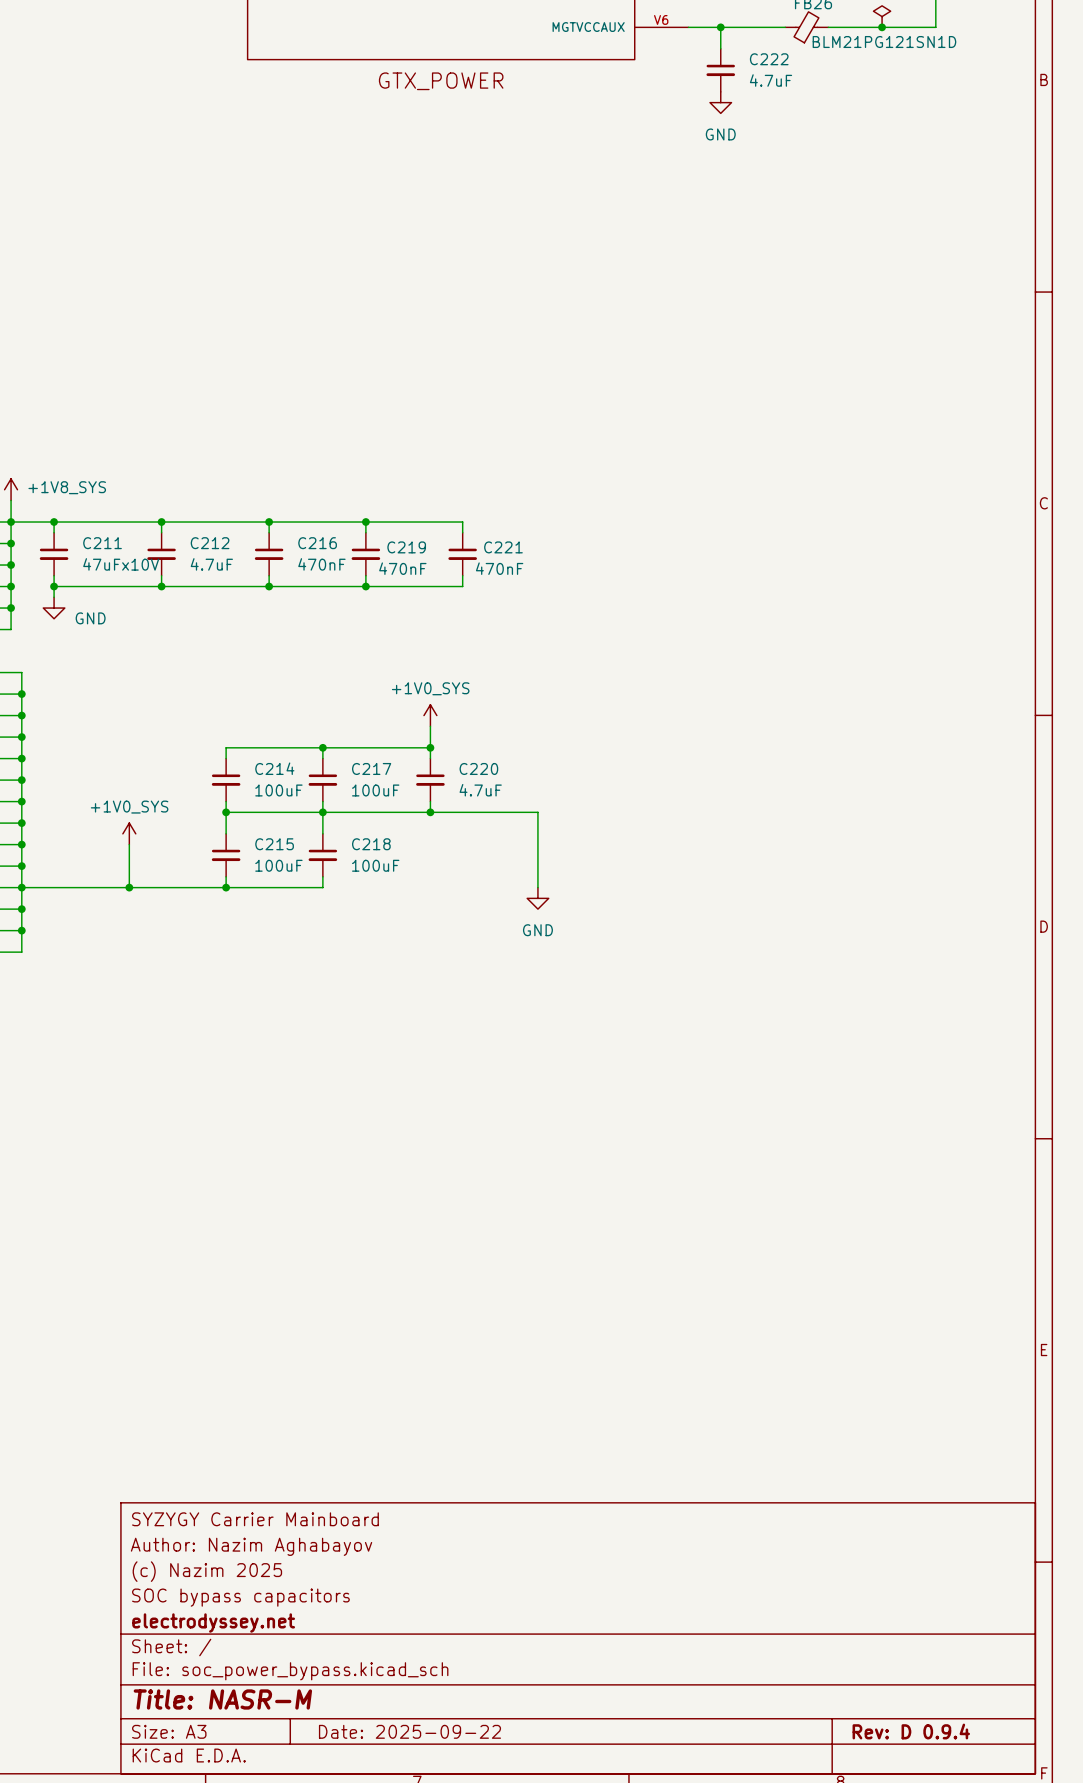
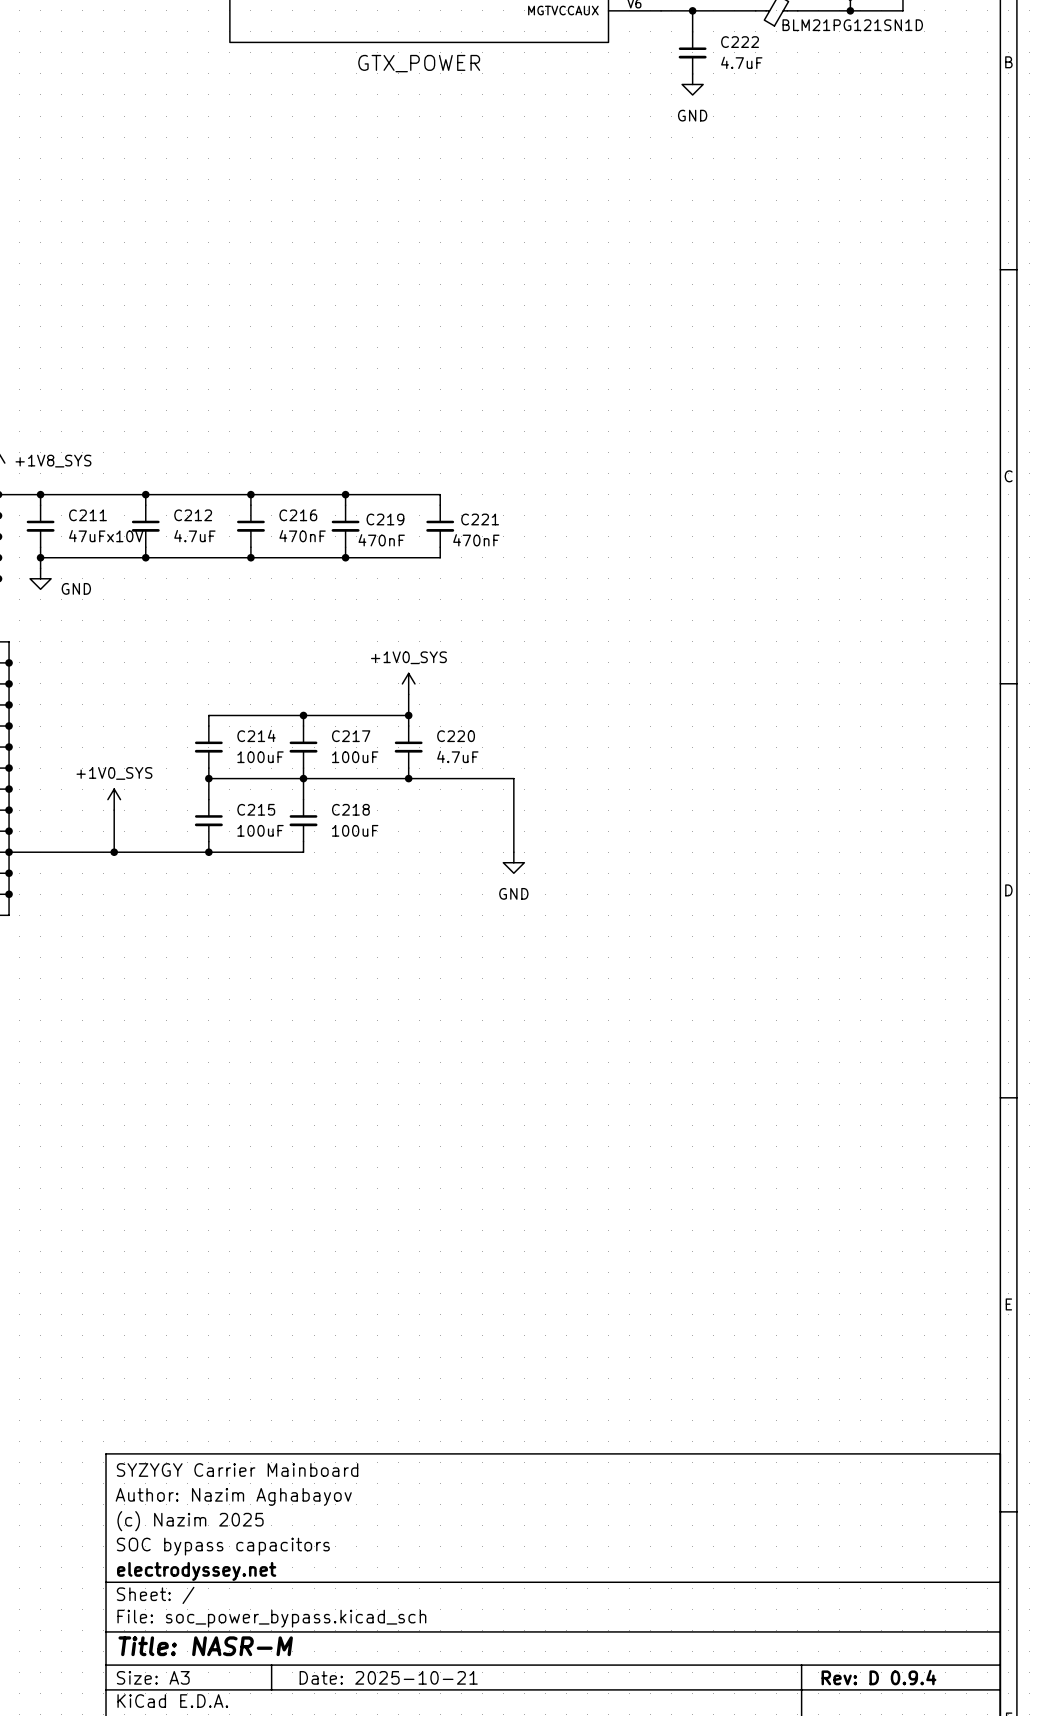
title block: Date: 2025-09-22 (409, 1731) -> Date: 2025-10-21 (388, 1677)

